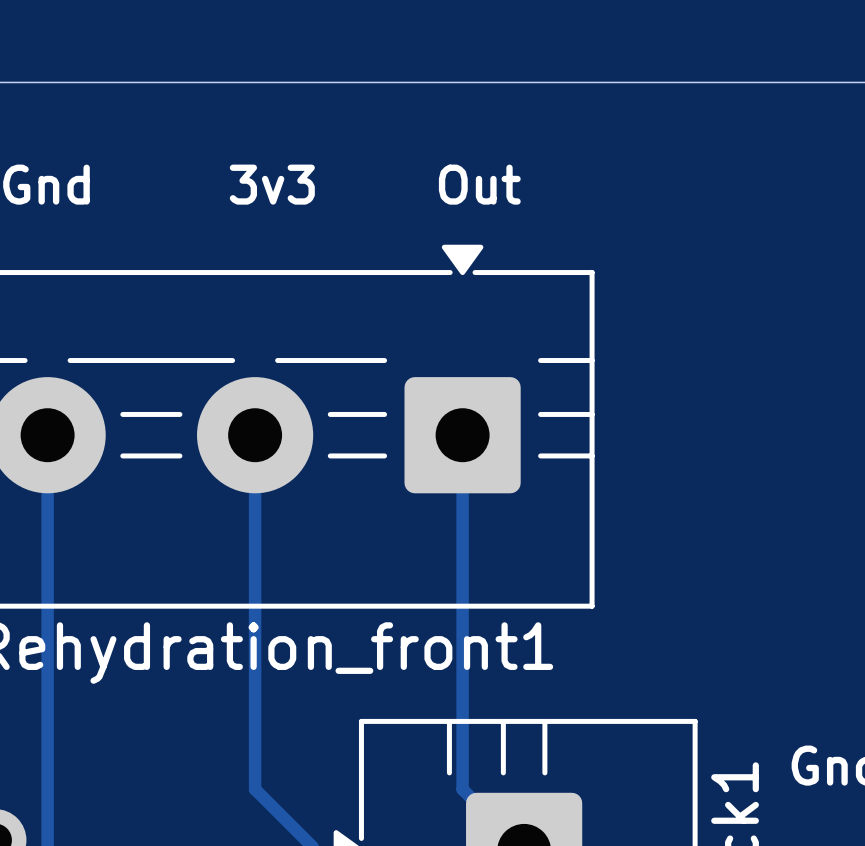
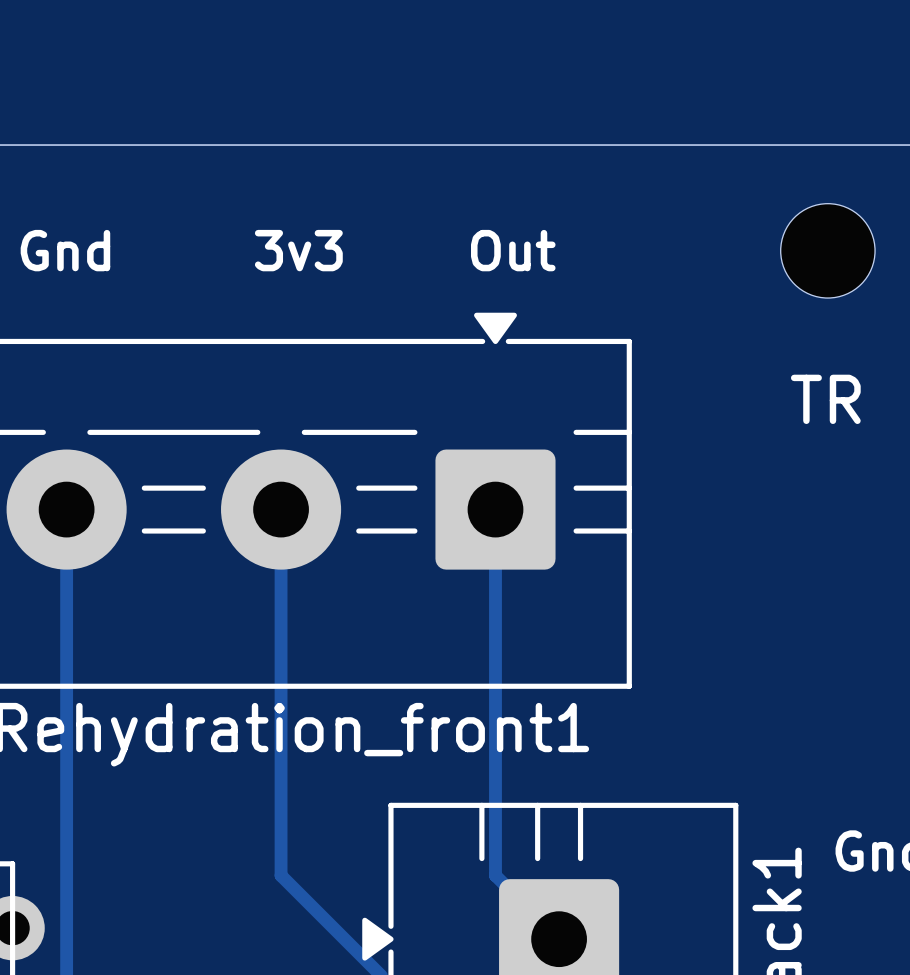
TR: none -> (827, 250)

